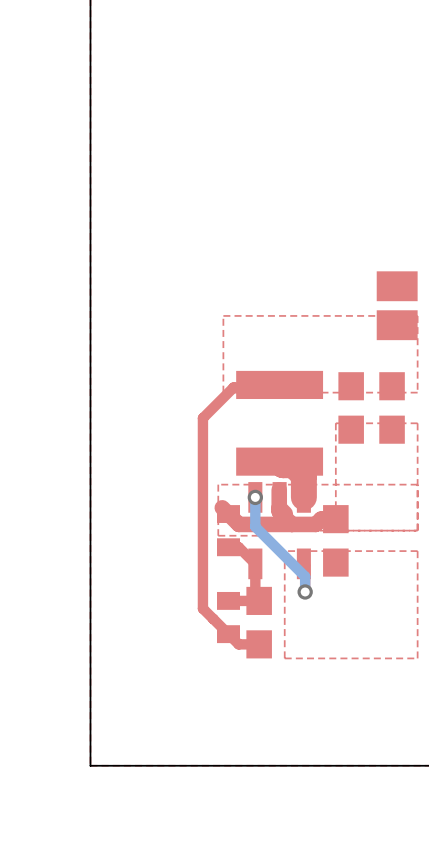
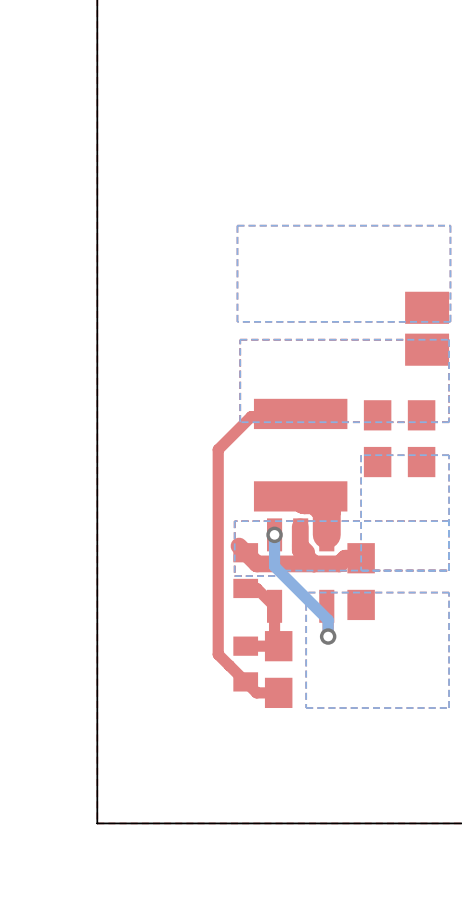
bottom zone outline: none -> (450, 225) (237, 225) (237, 321) (450, 321) (450, 225)
bottom zone outline: none -> (449, 339) (449, 422) (240, 422) (240, 339) (449, 339)
bottom zone outline: none -> (449, 521) (234, 521) (234, 576) (284, 576) (284, 570) (449, 570) (449, 455) (361, 455) (361, 570)
bottom zone outline: none -> (449, 592) (449, 708) (306, 708) (306, 592) (449, 592)

